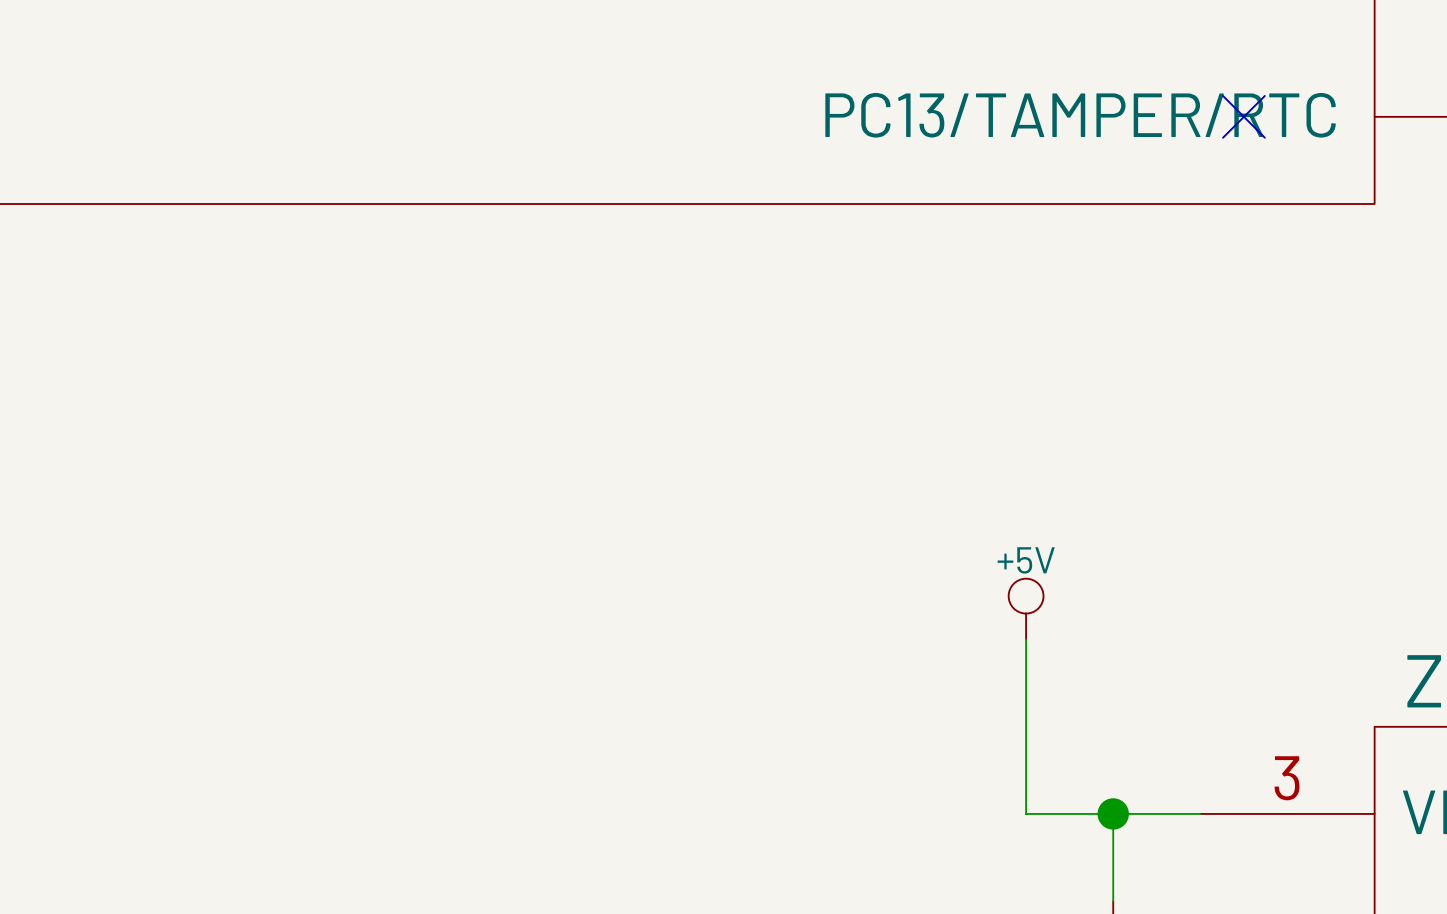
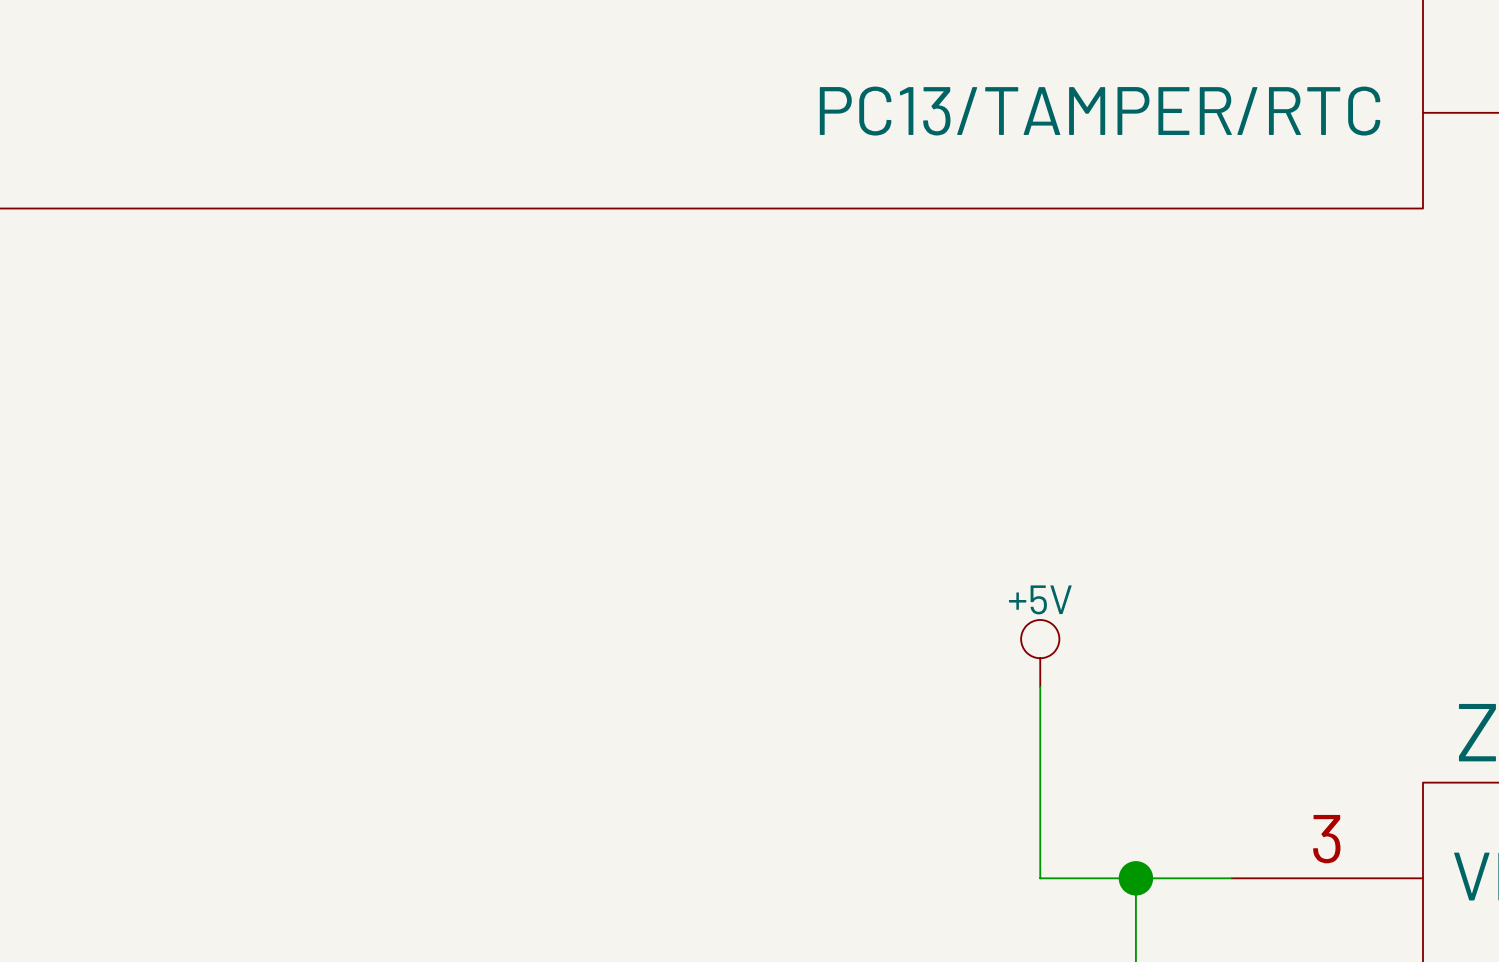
no-connect mark: (1243, 116) -> none

